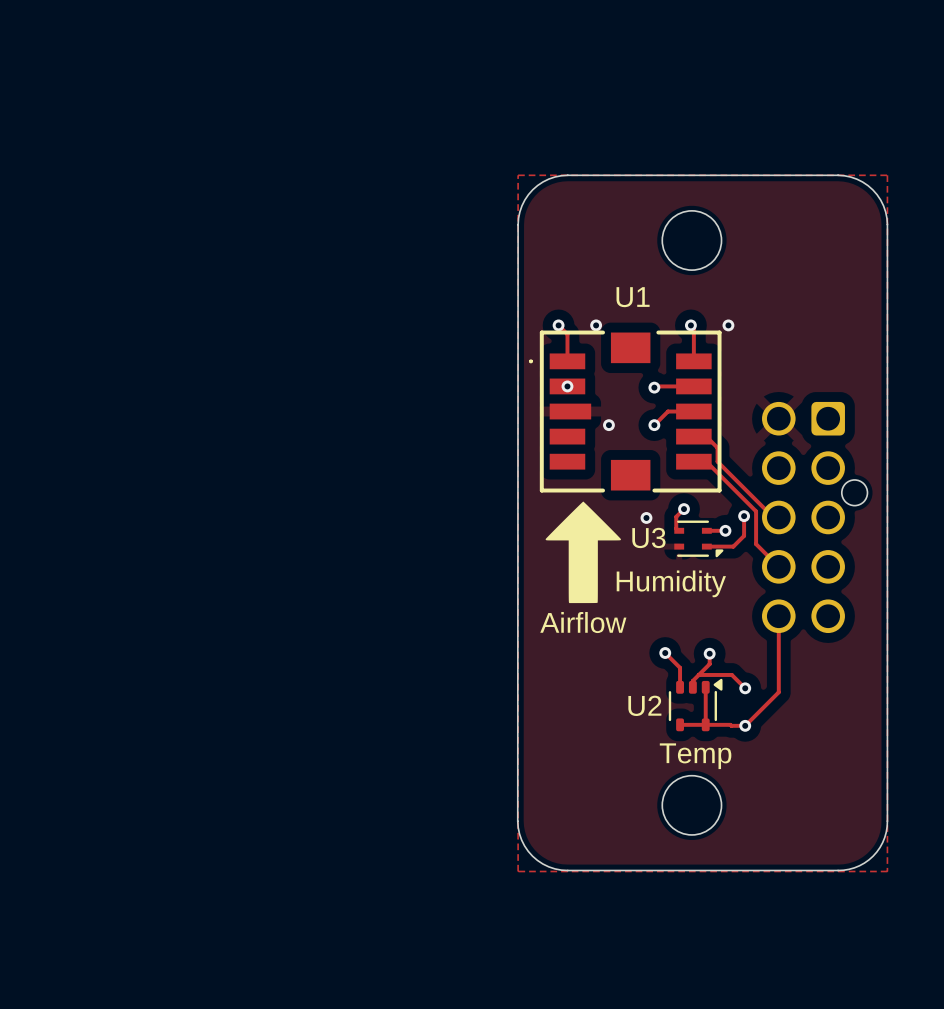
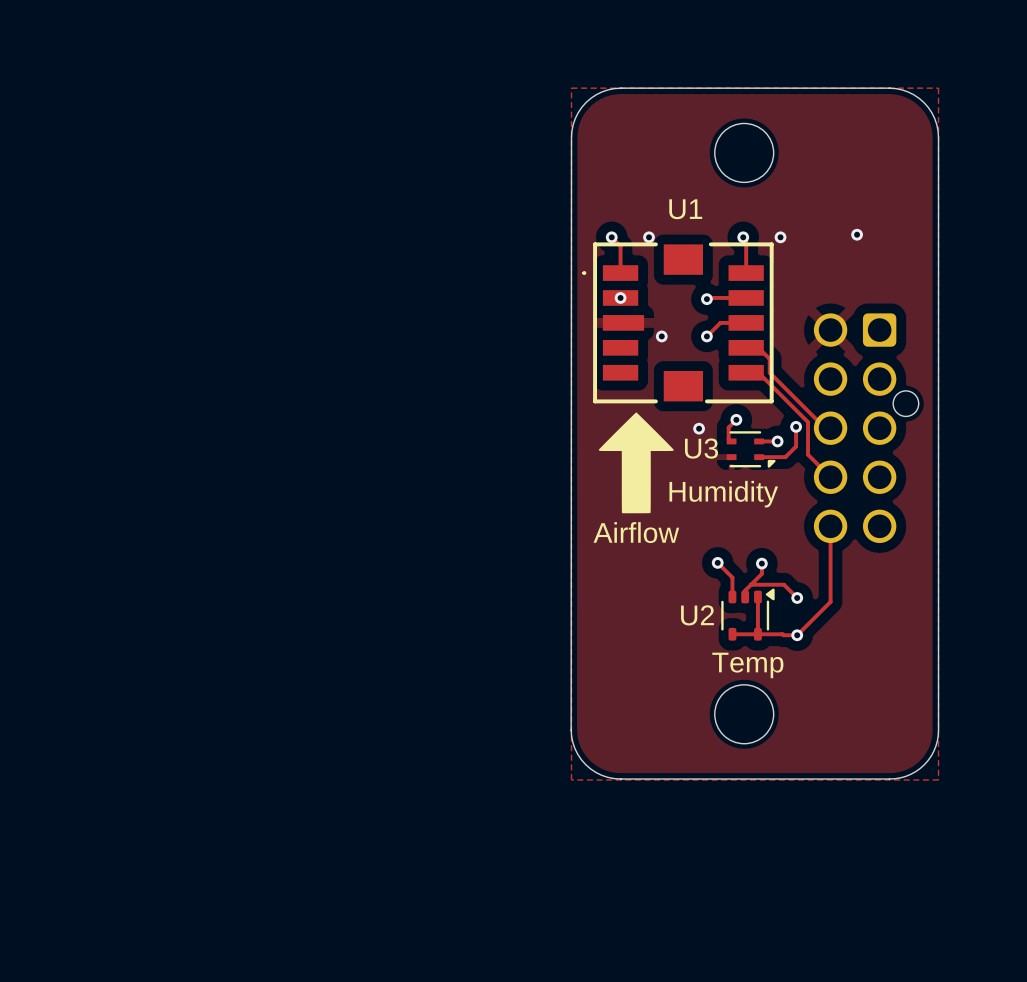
via: none -> (857, 234)

